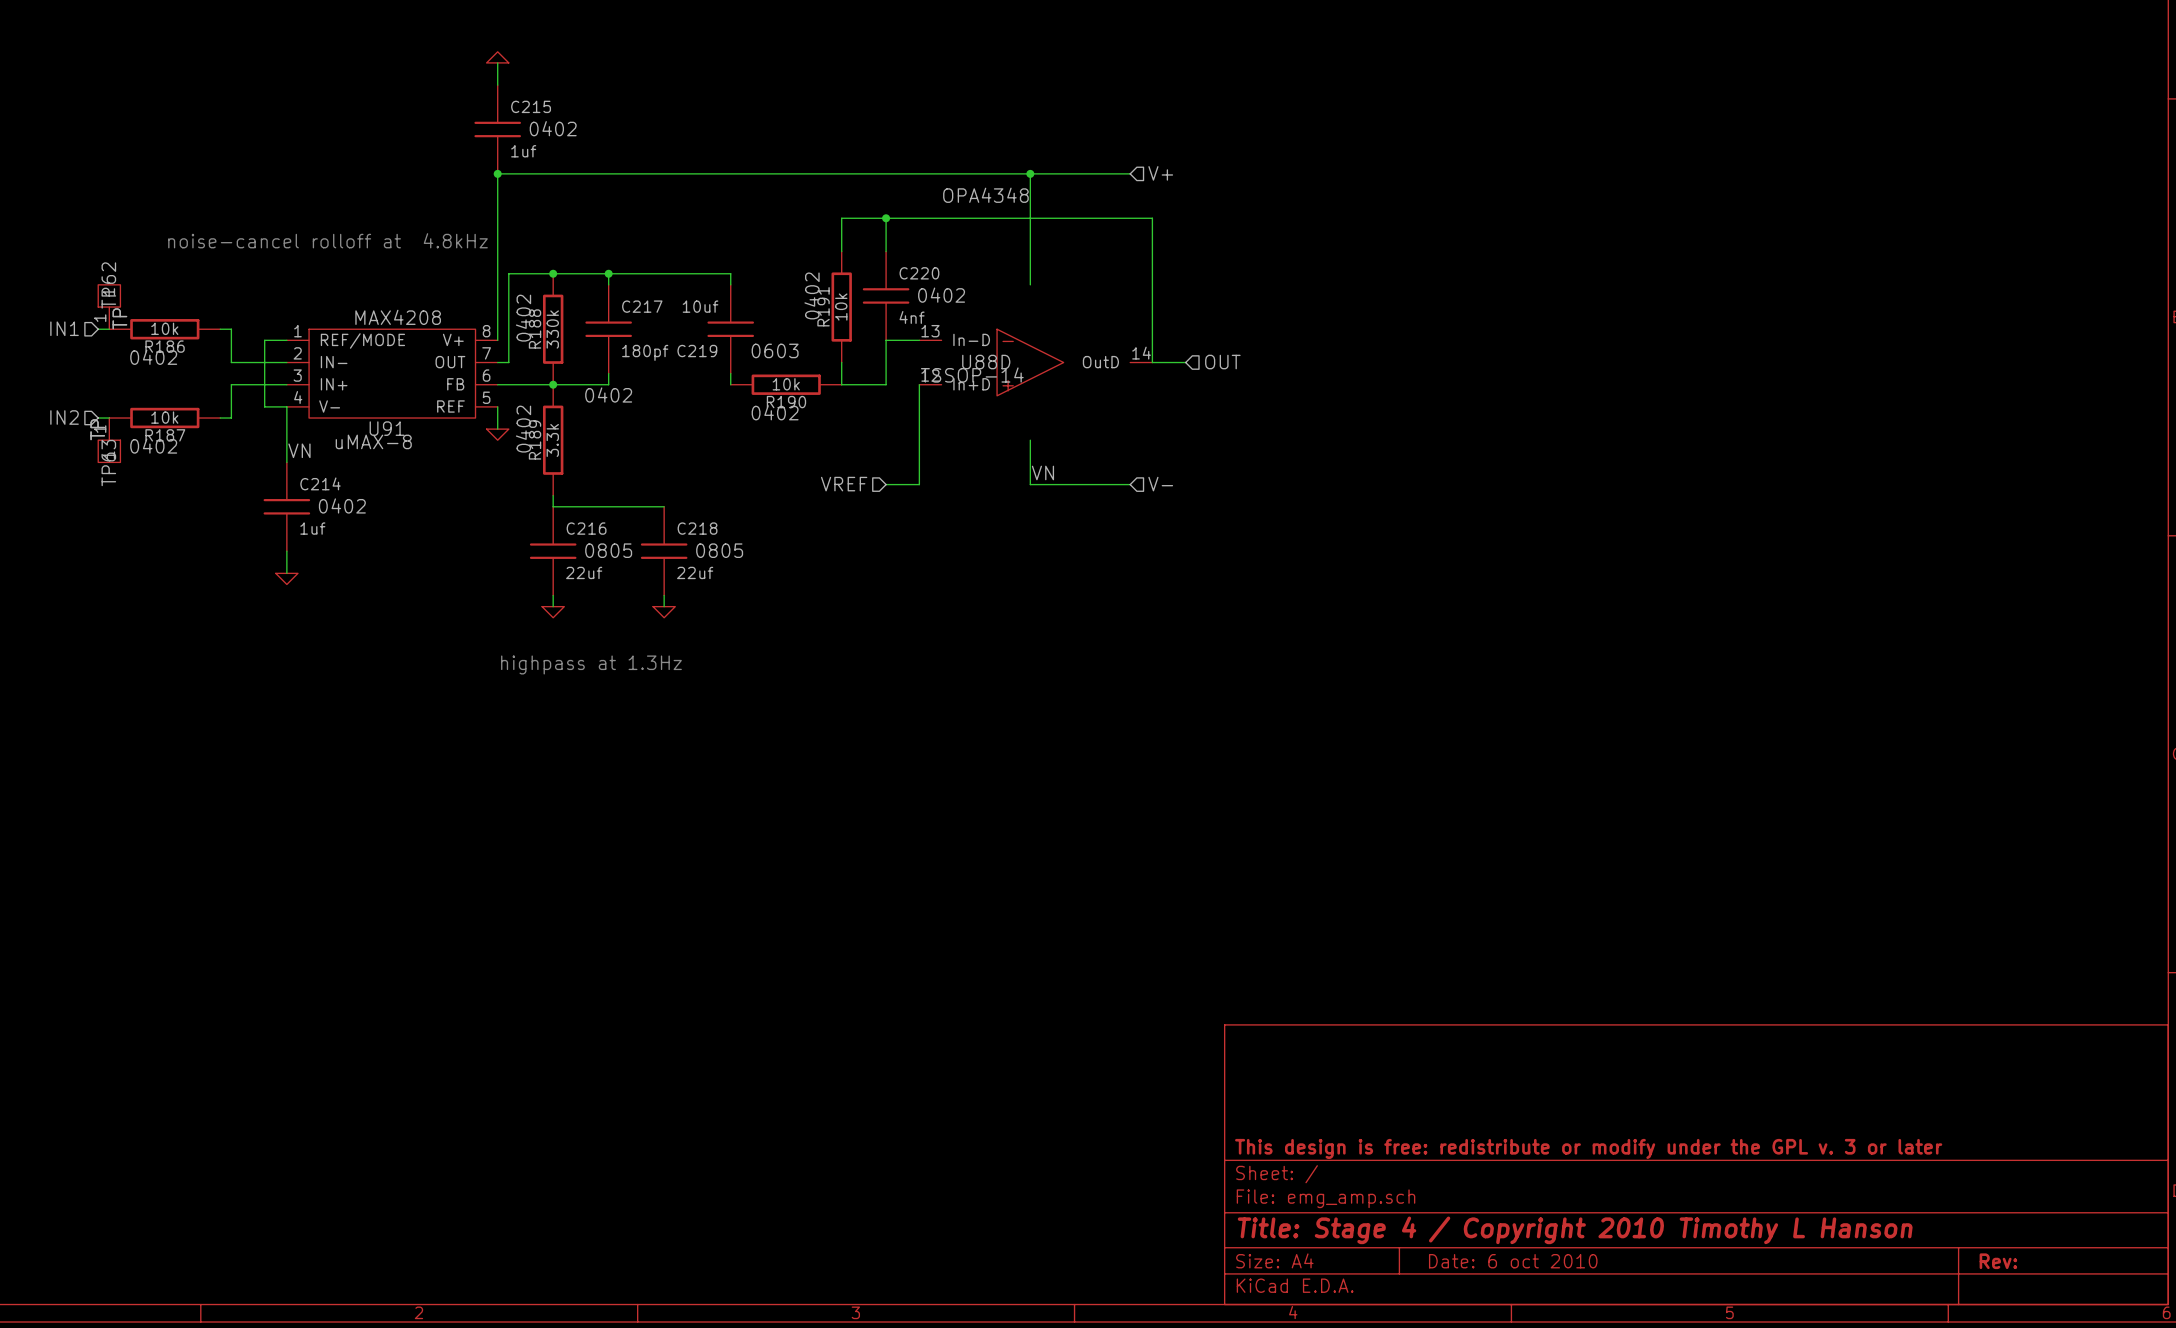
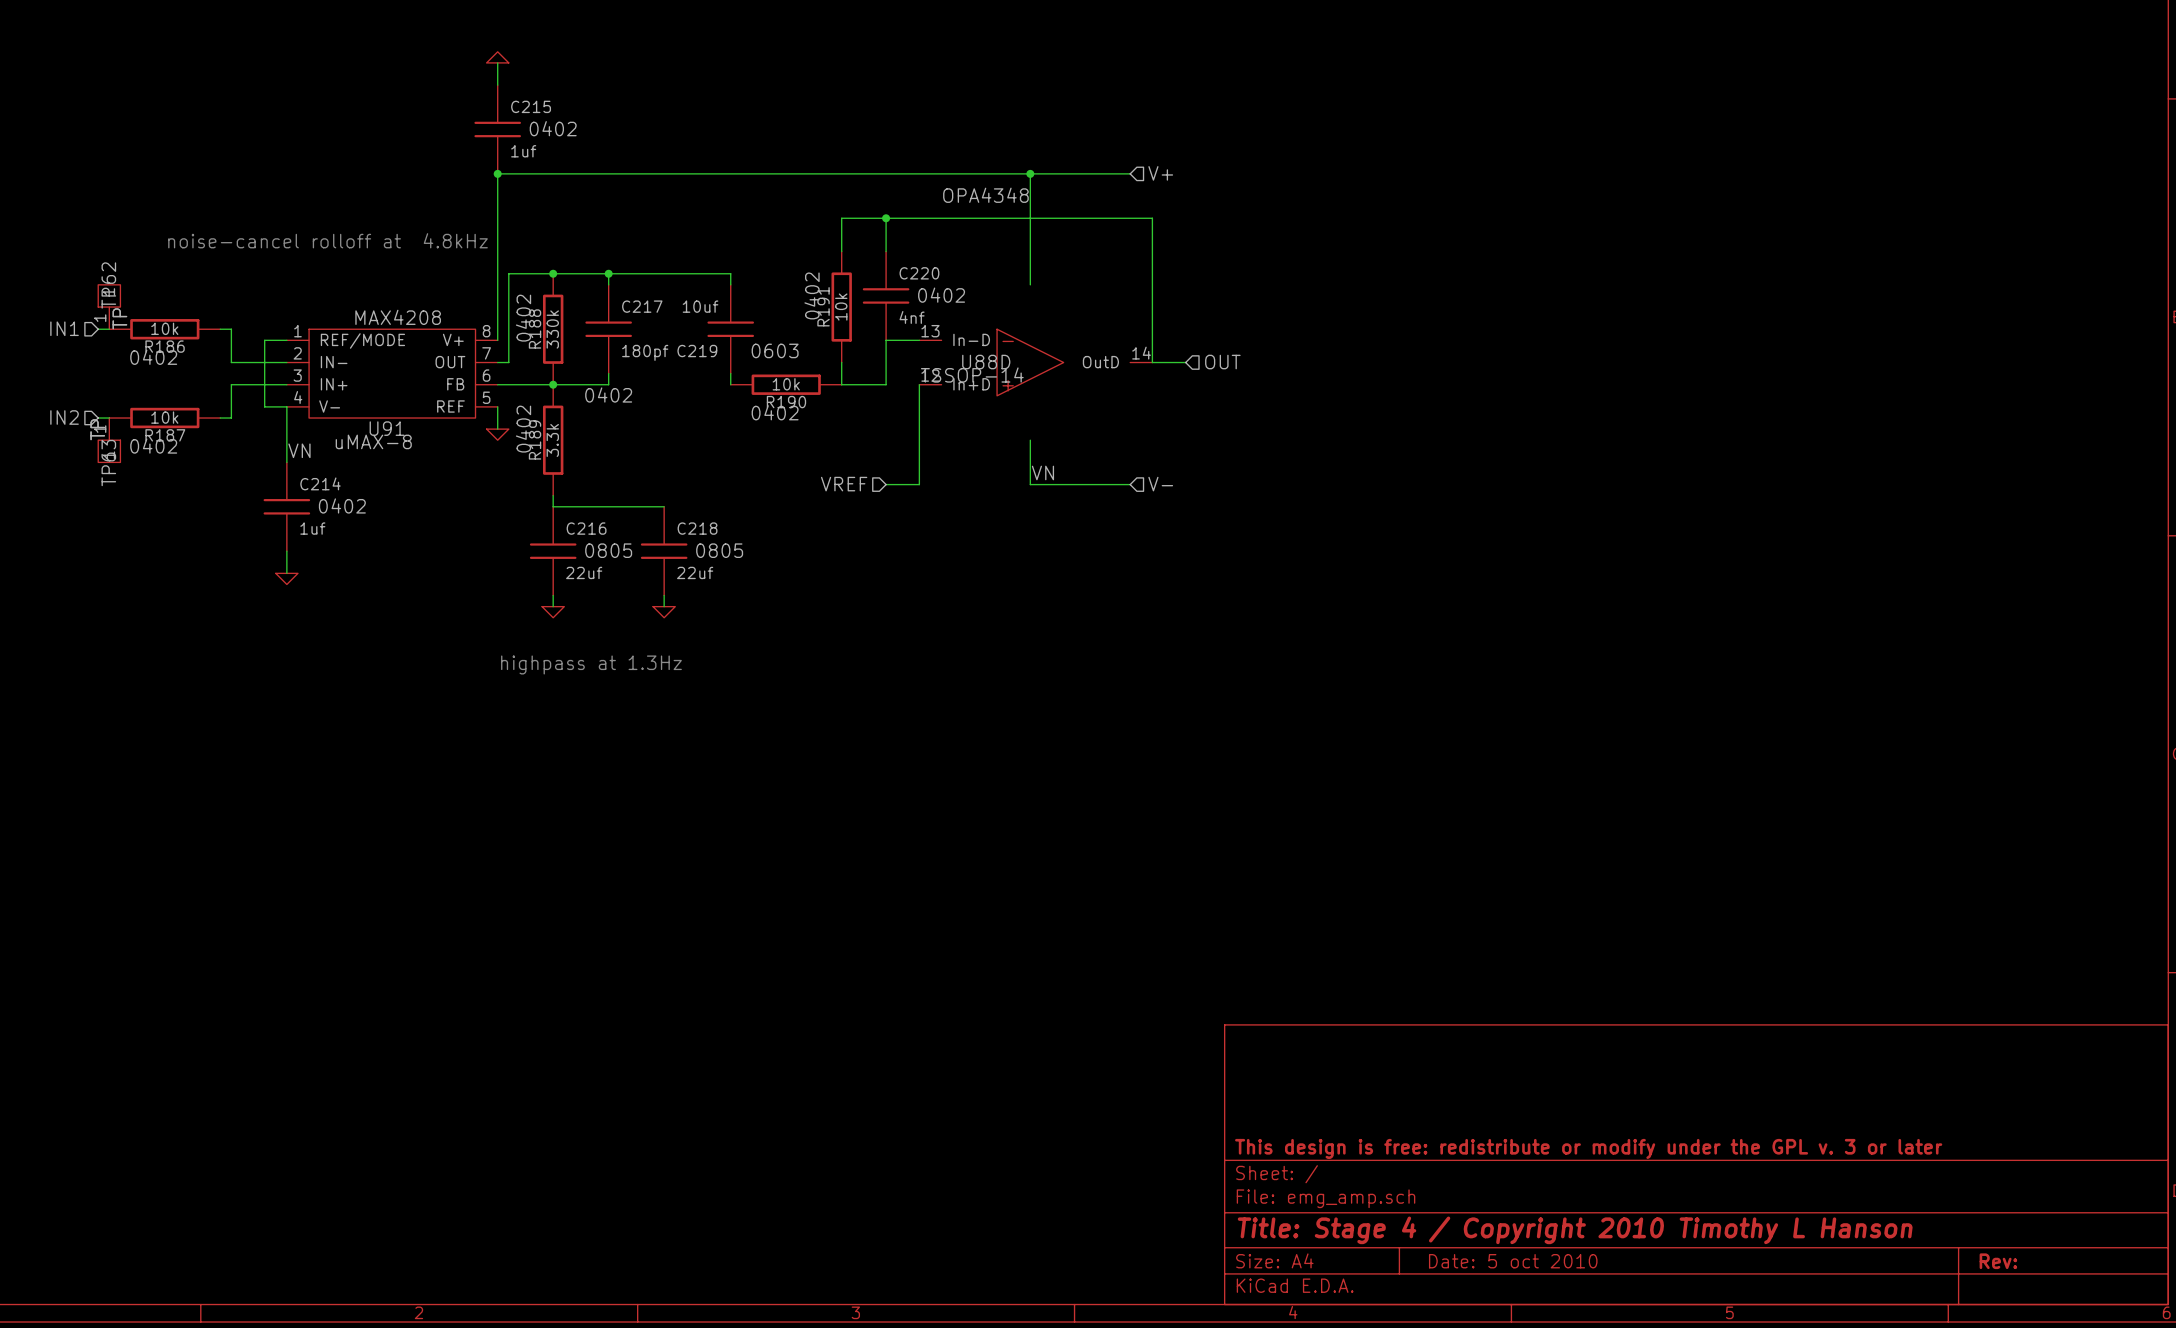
title block: Date: 6 oct 2010 (1513, 1261) -> Date: 5 oct 2010 (1513, 1261)

